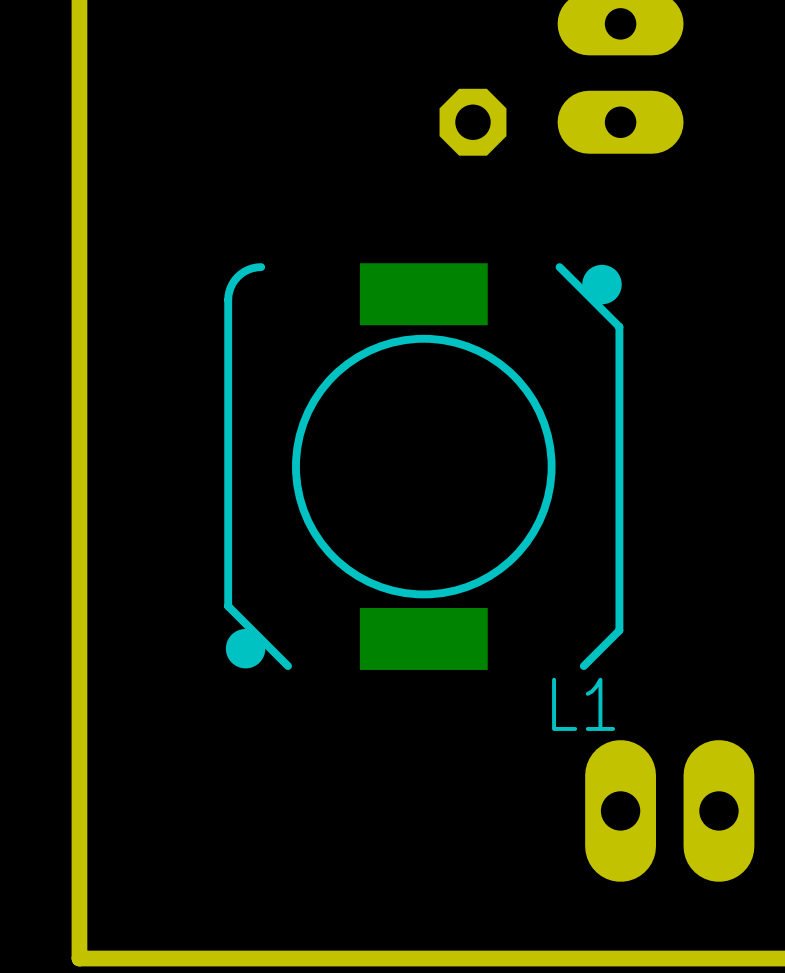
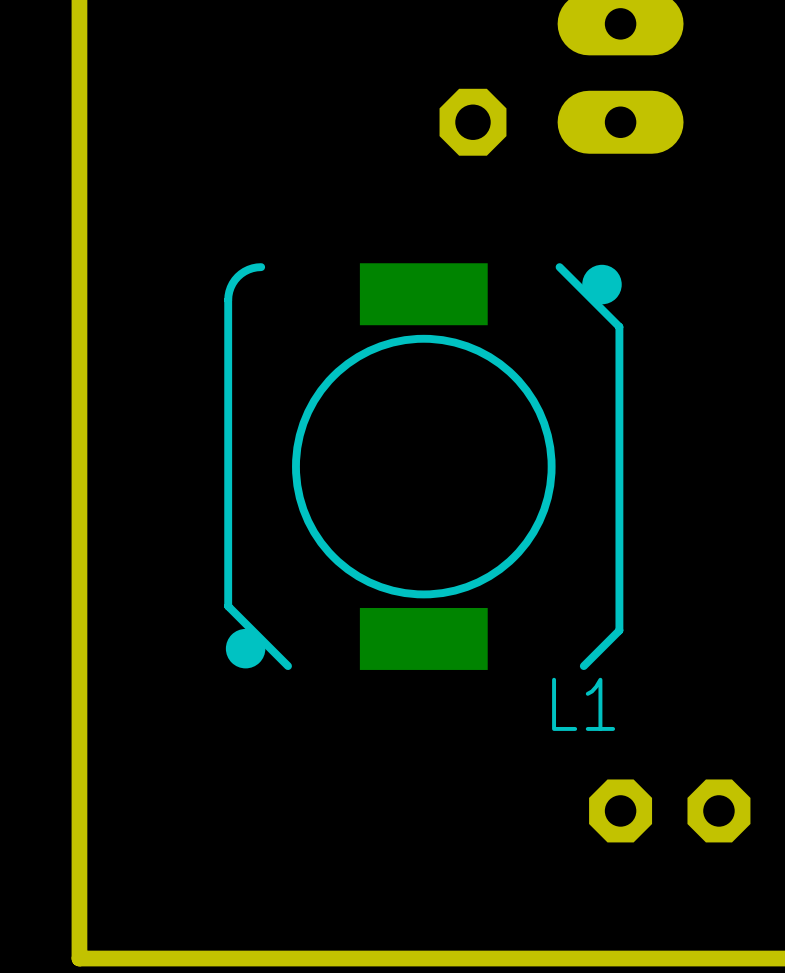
part footprint: [585, 740, 755, 882] -> [589, 779, 751, 843]

